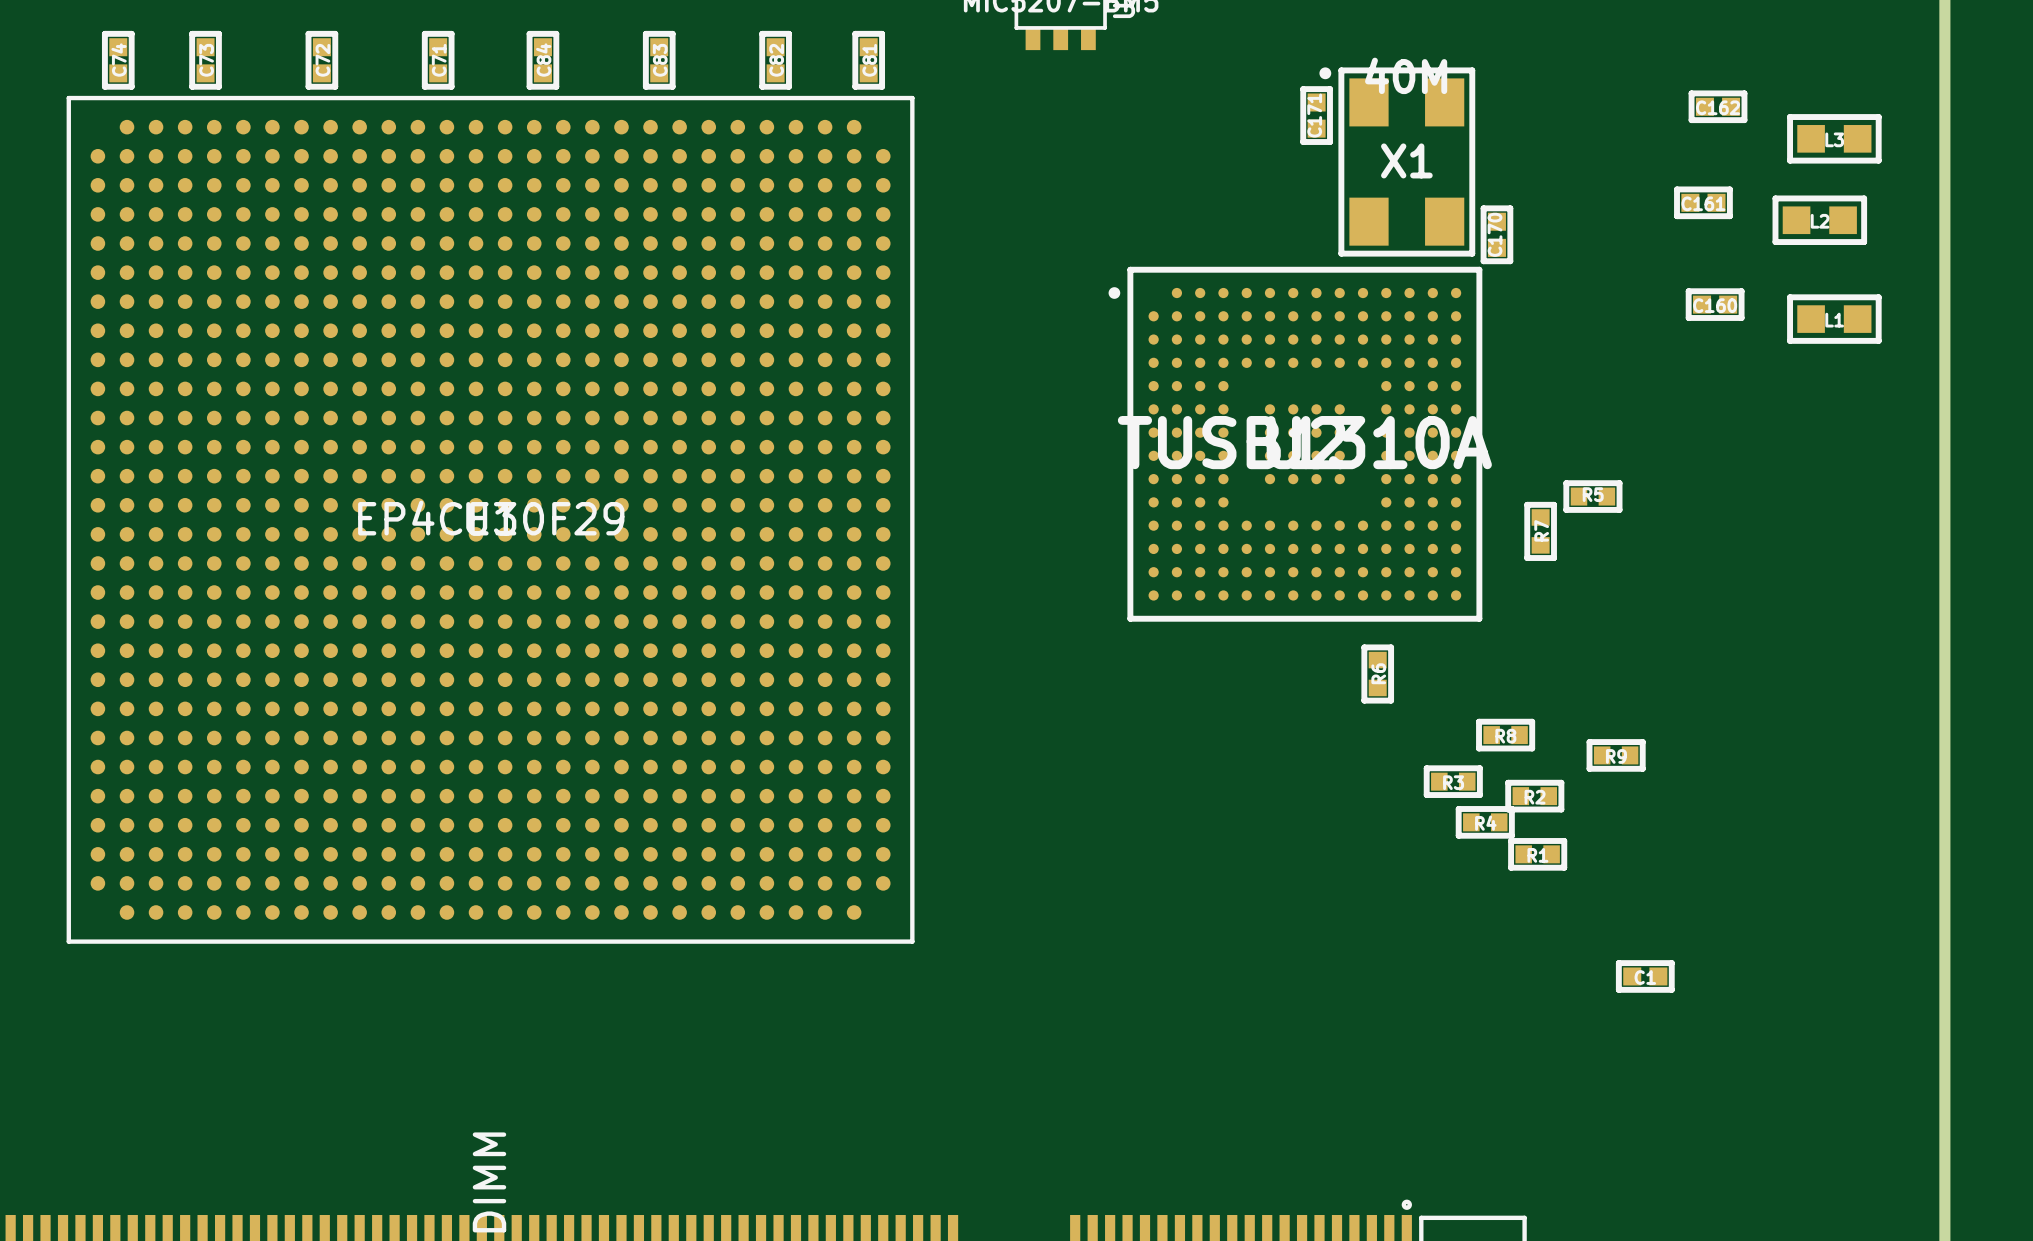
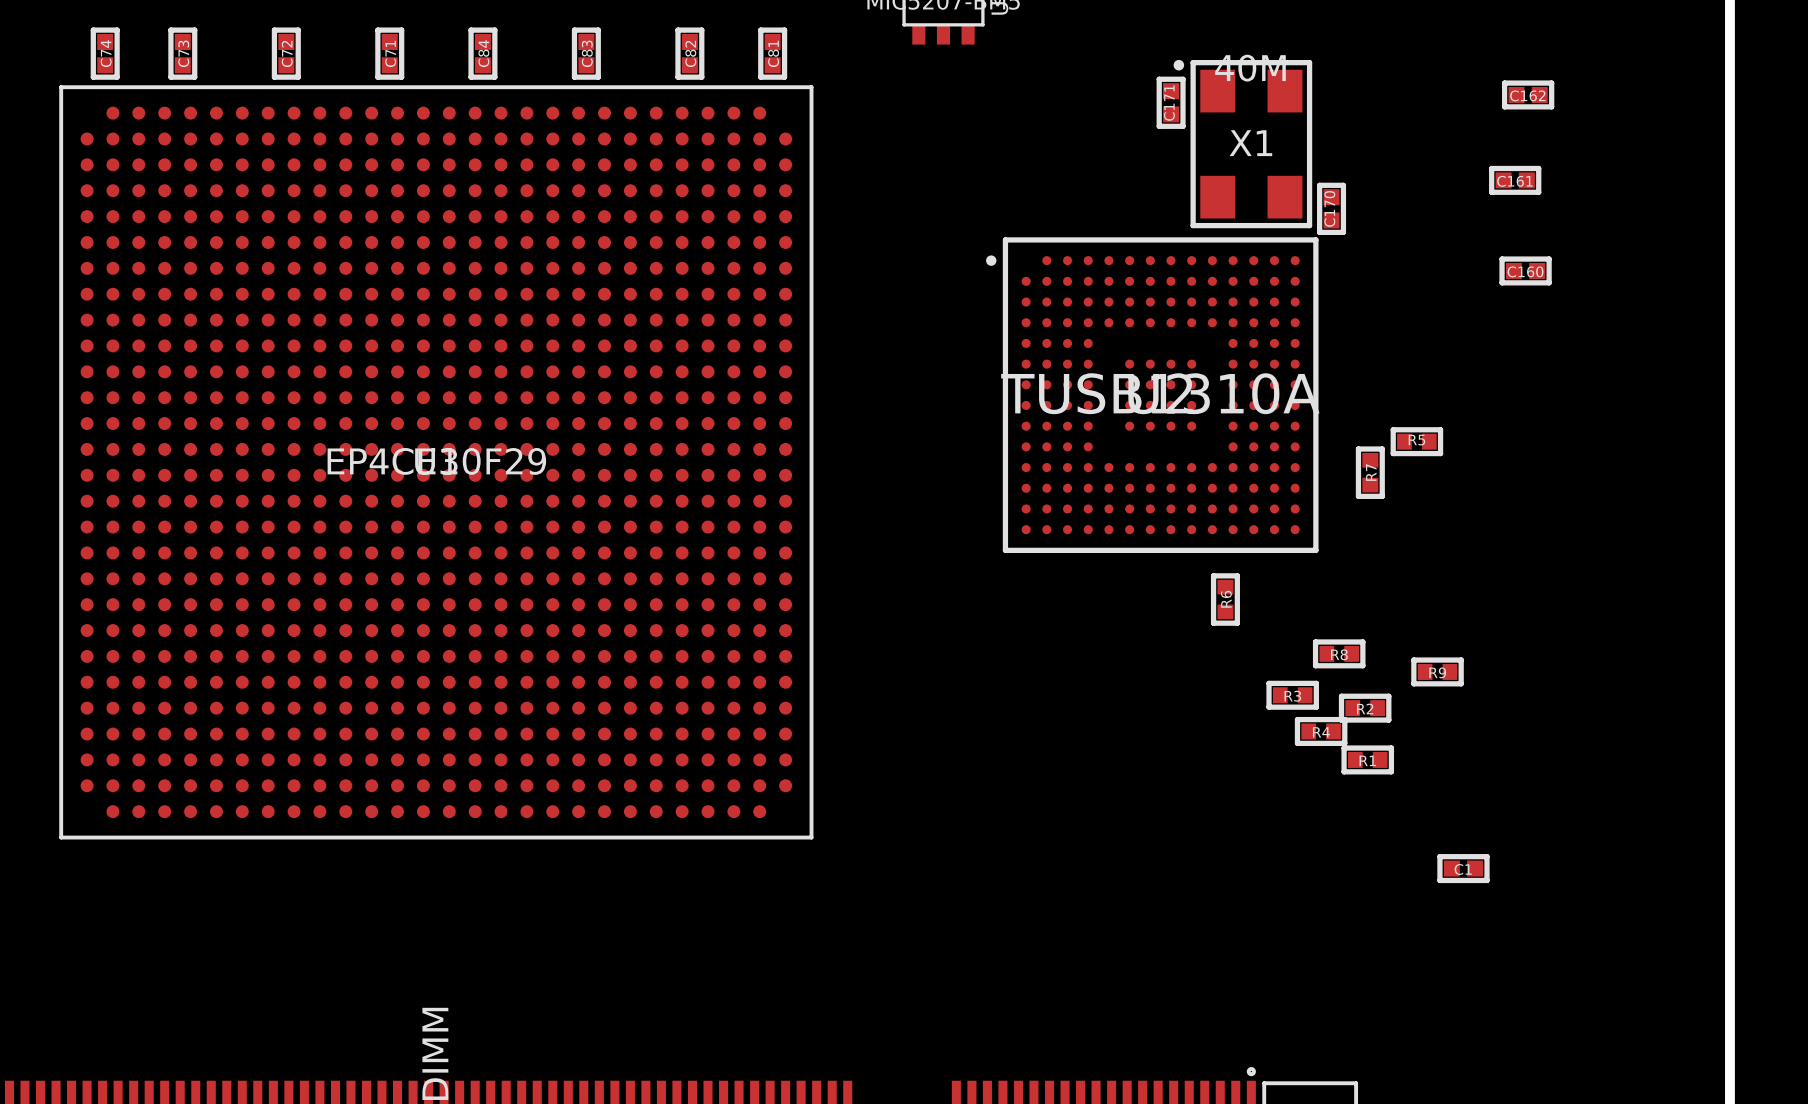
L3: (1834, 138) -> none
L2: (1819, 220) -> none
L1: (1834, 319) -> none

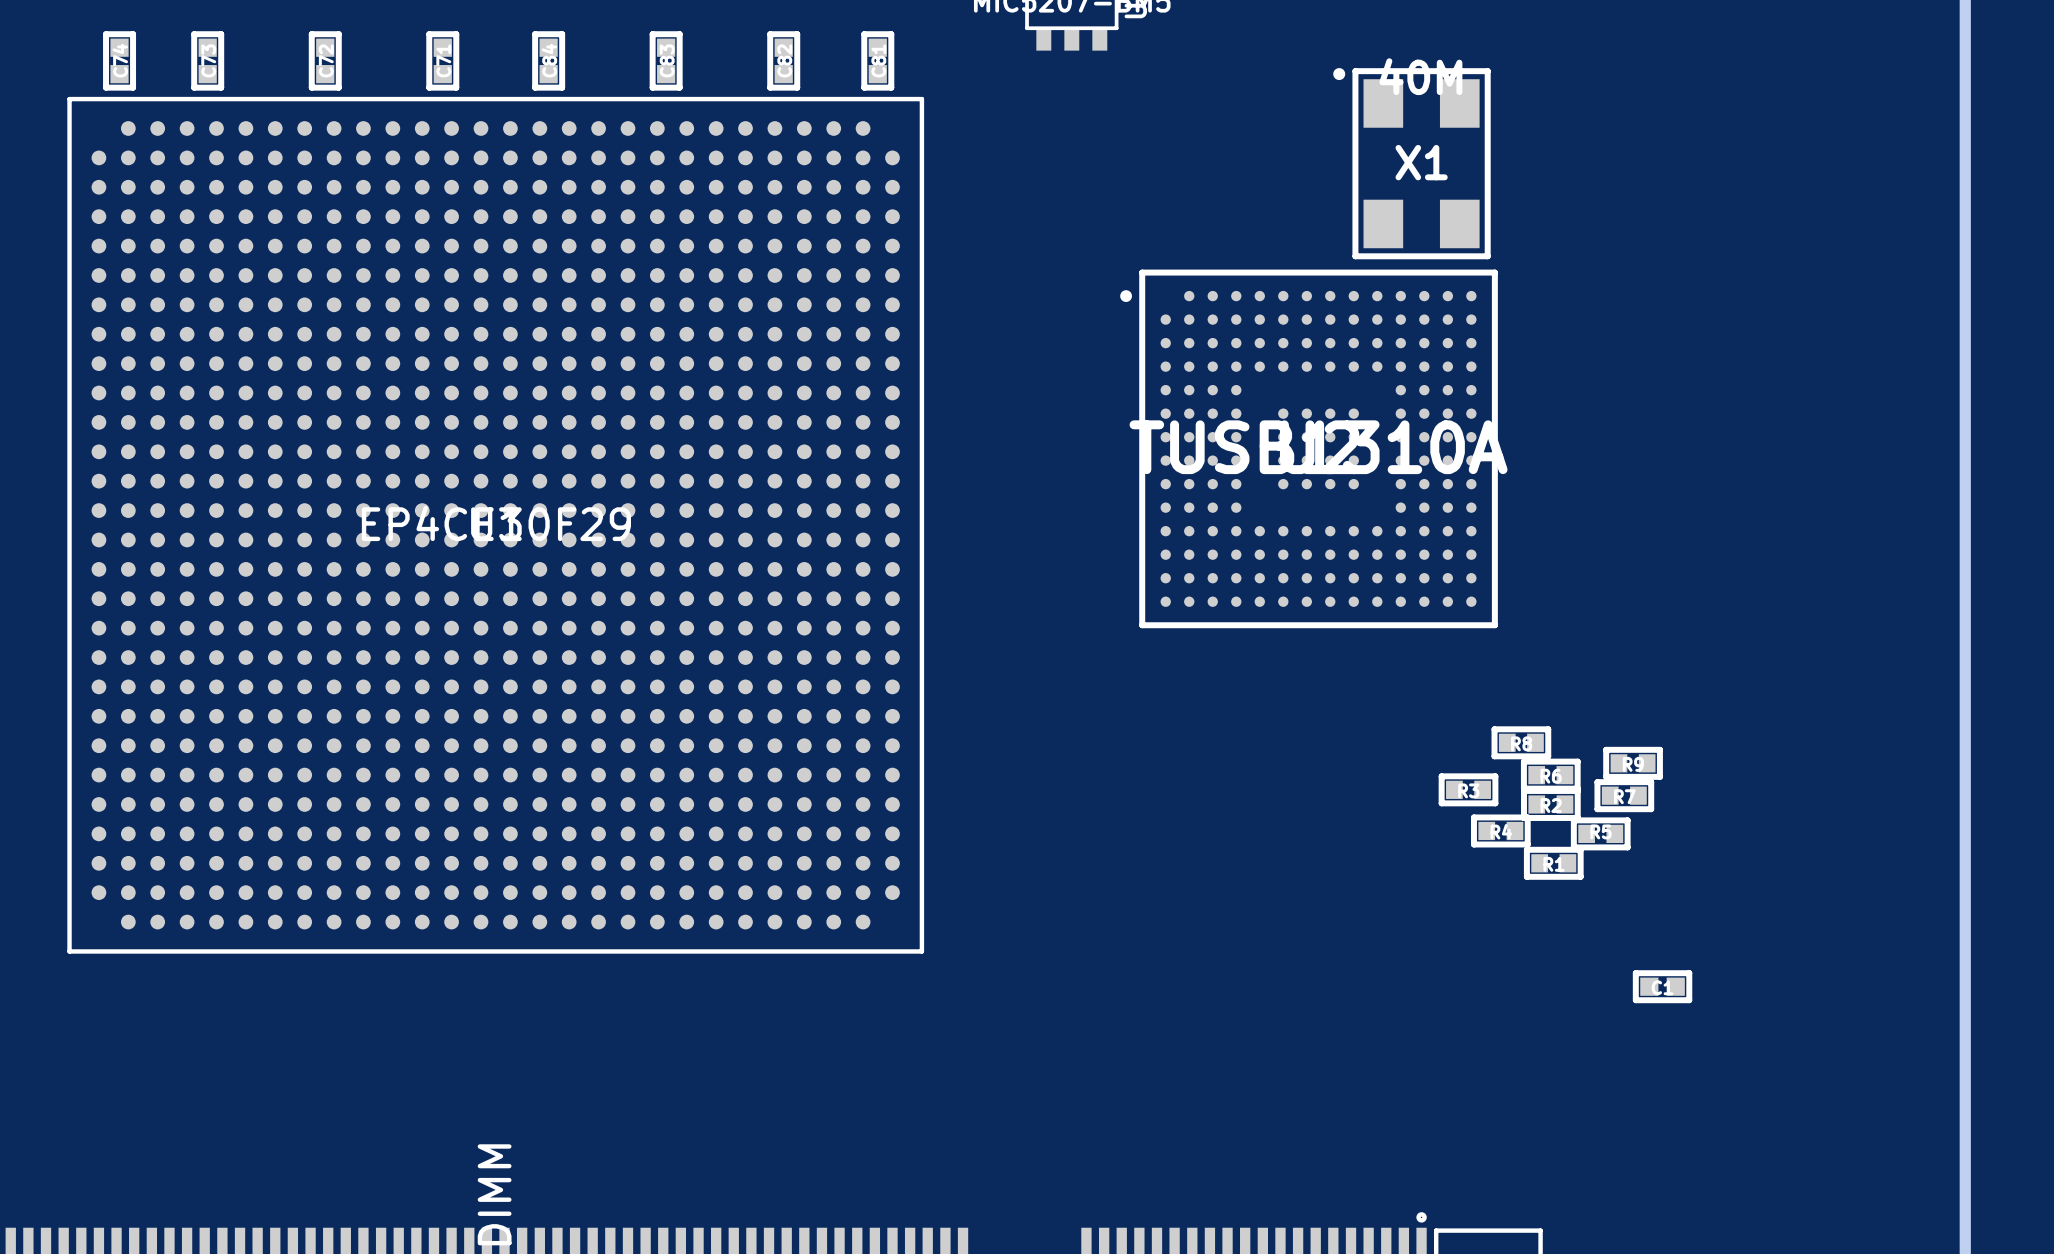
C162: (1528, 94) -> none
C171: (1171, 102) -> none
C161: (1515, 180) -> none
C170: (1331, 208) -> none
C160: (1525, 270) -> none
R5 position: (1416, 441) -> (1600, 833)
R7 rotation: 0° (1370, 472) -> 90° clockwise (1624, 795)
R7 position: (1370, 472) -> (1624, 795)
R6 rotation: 0° (1225, 599) -> 90° clockwise (1550, 775)
R6 position: (1225, 599) -> (1550, 775)

